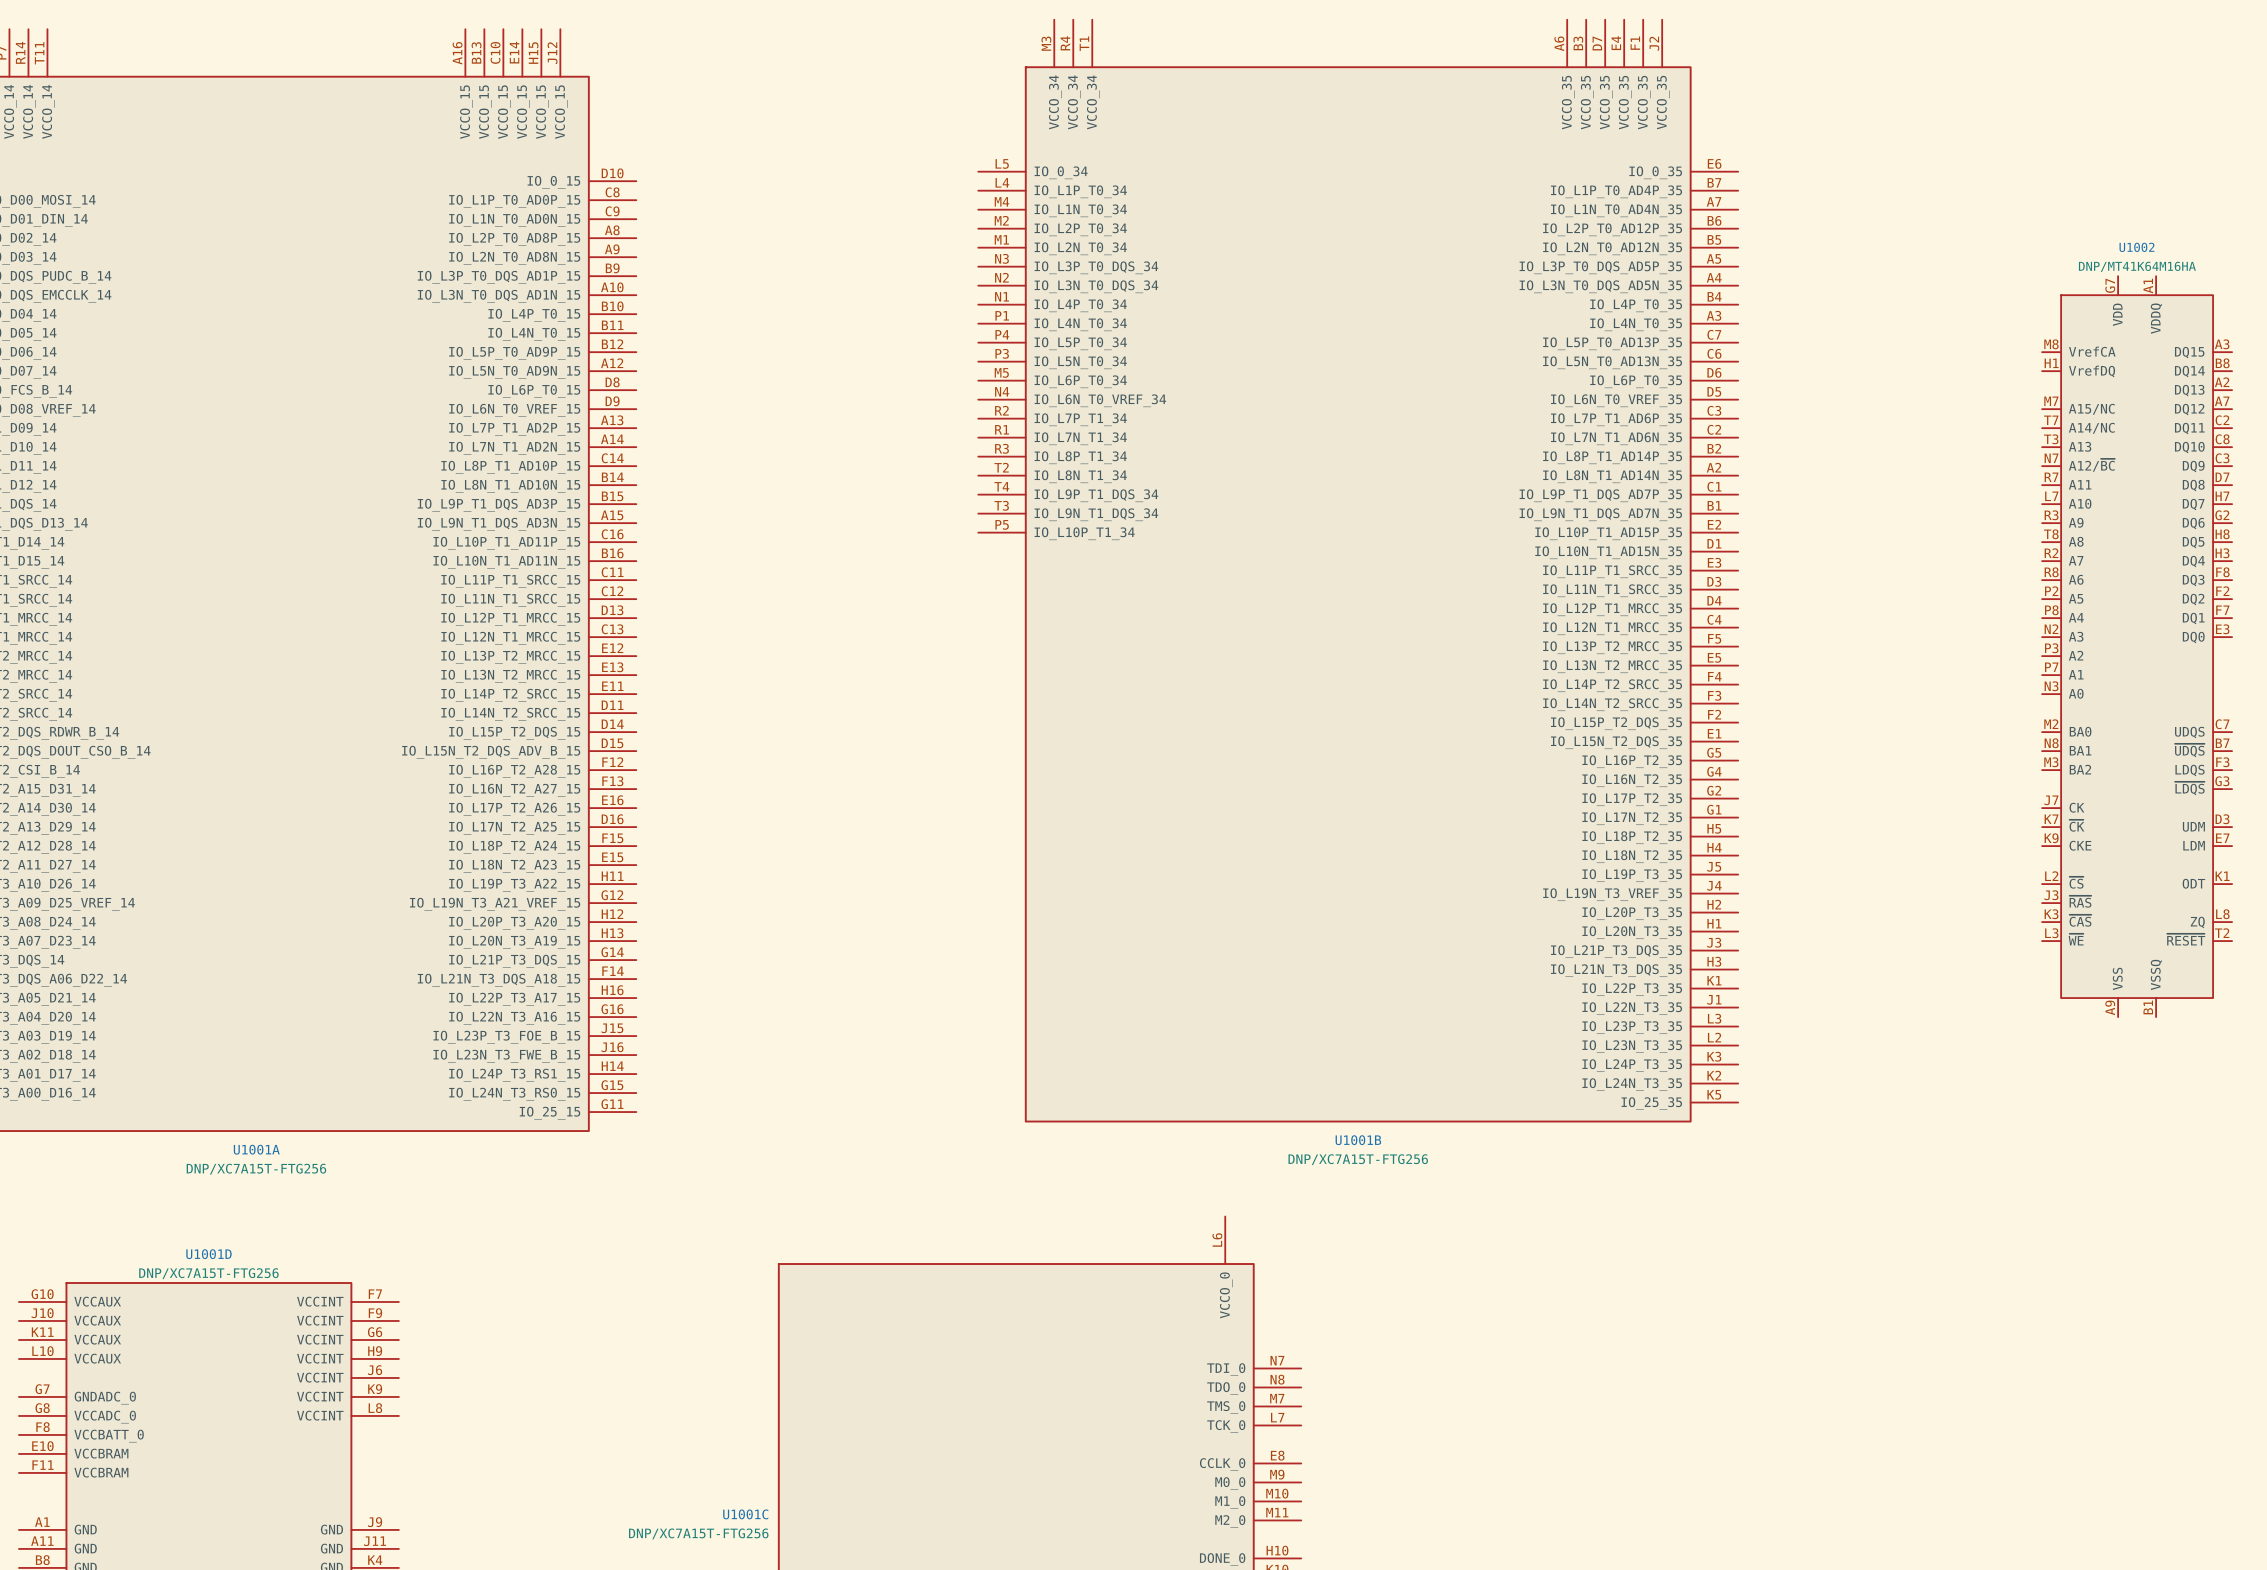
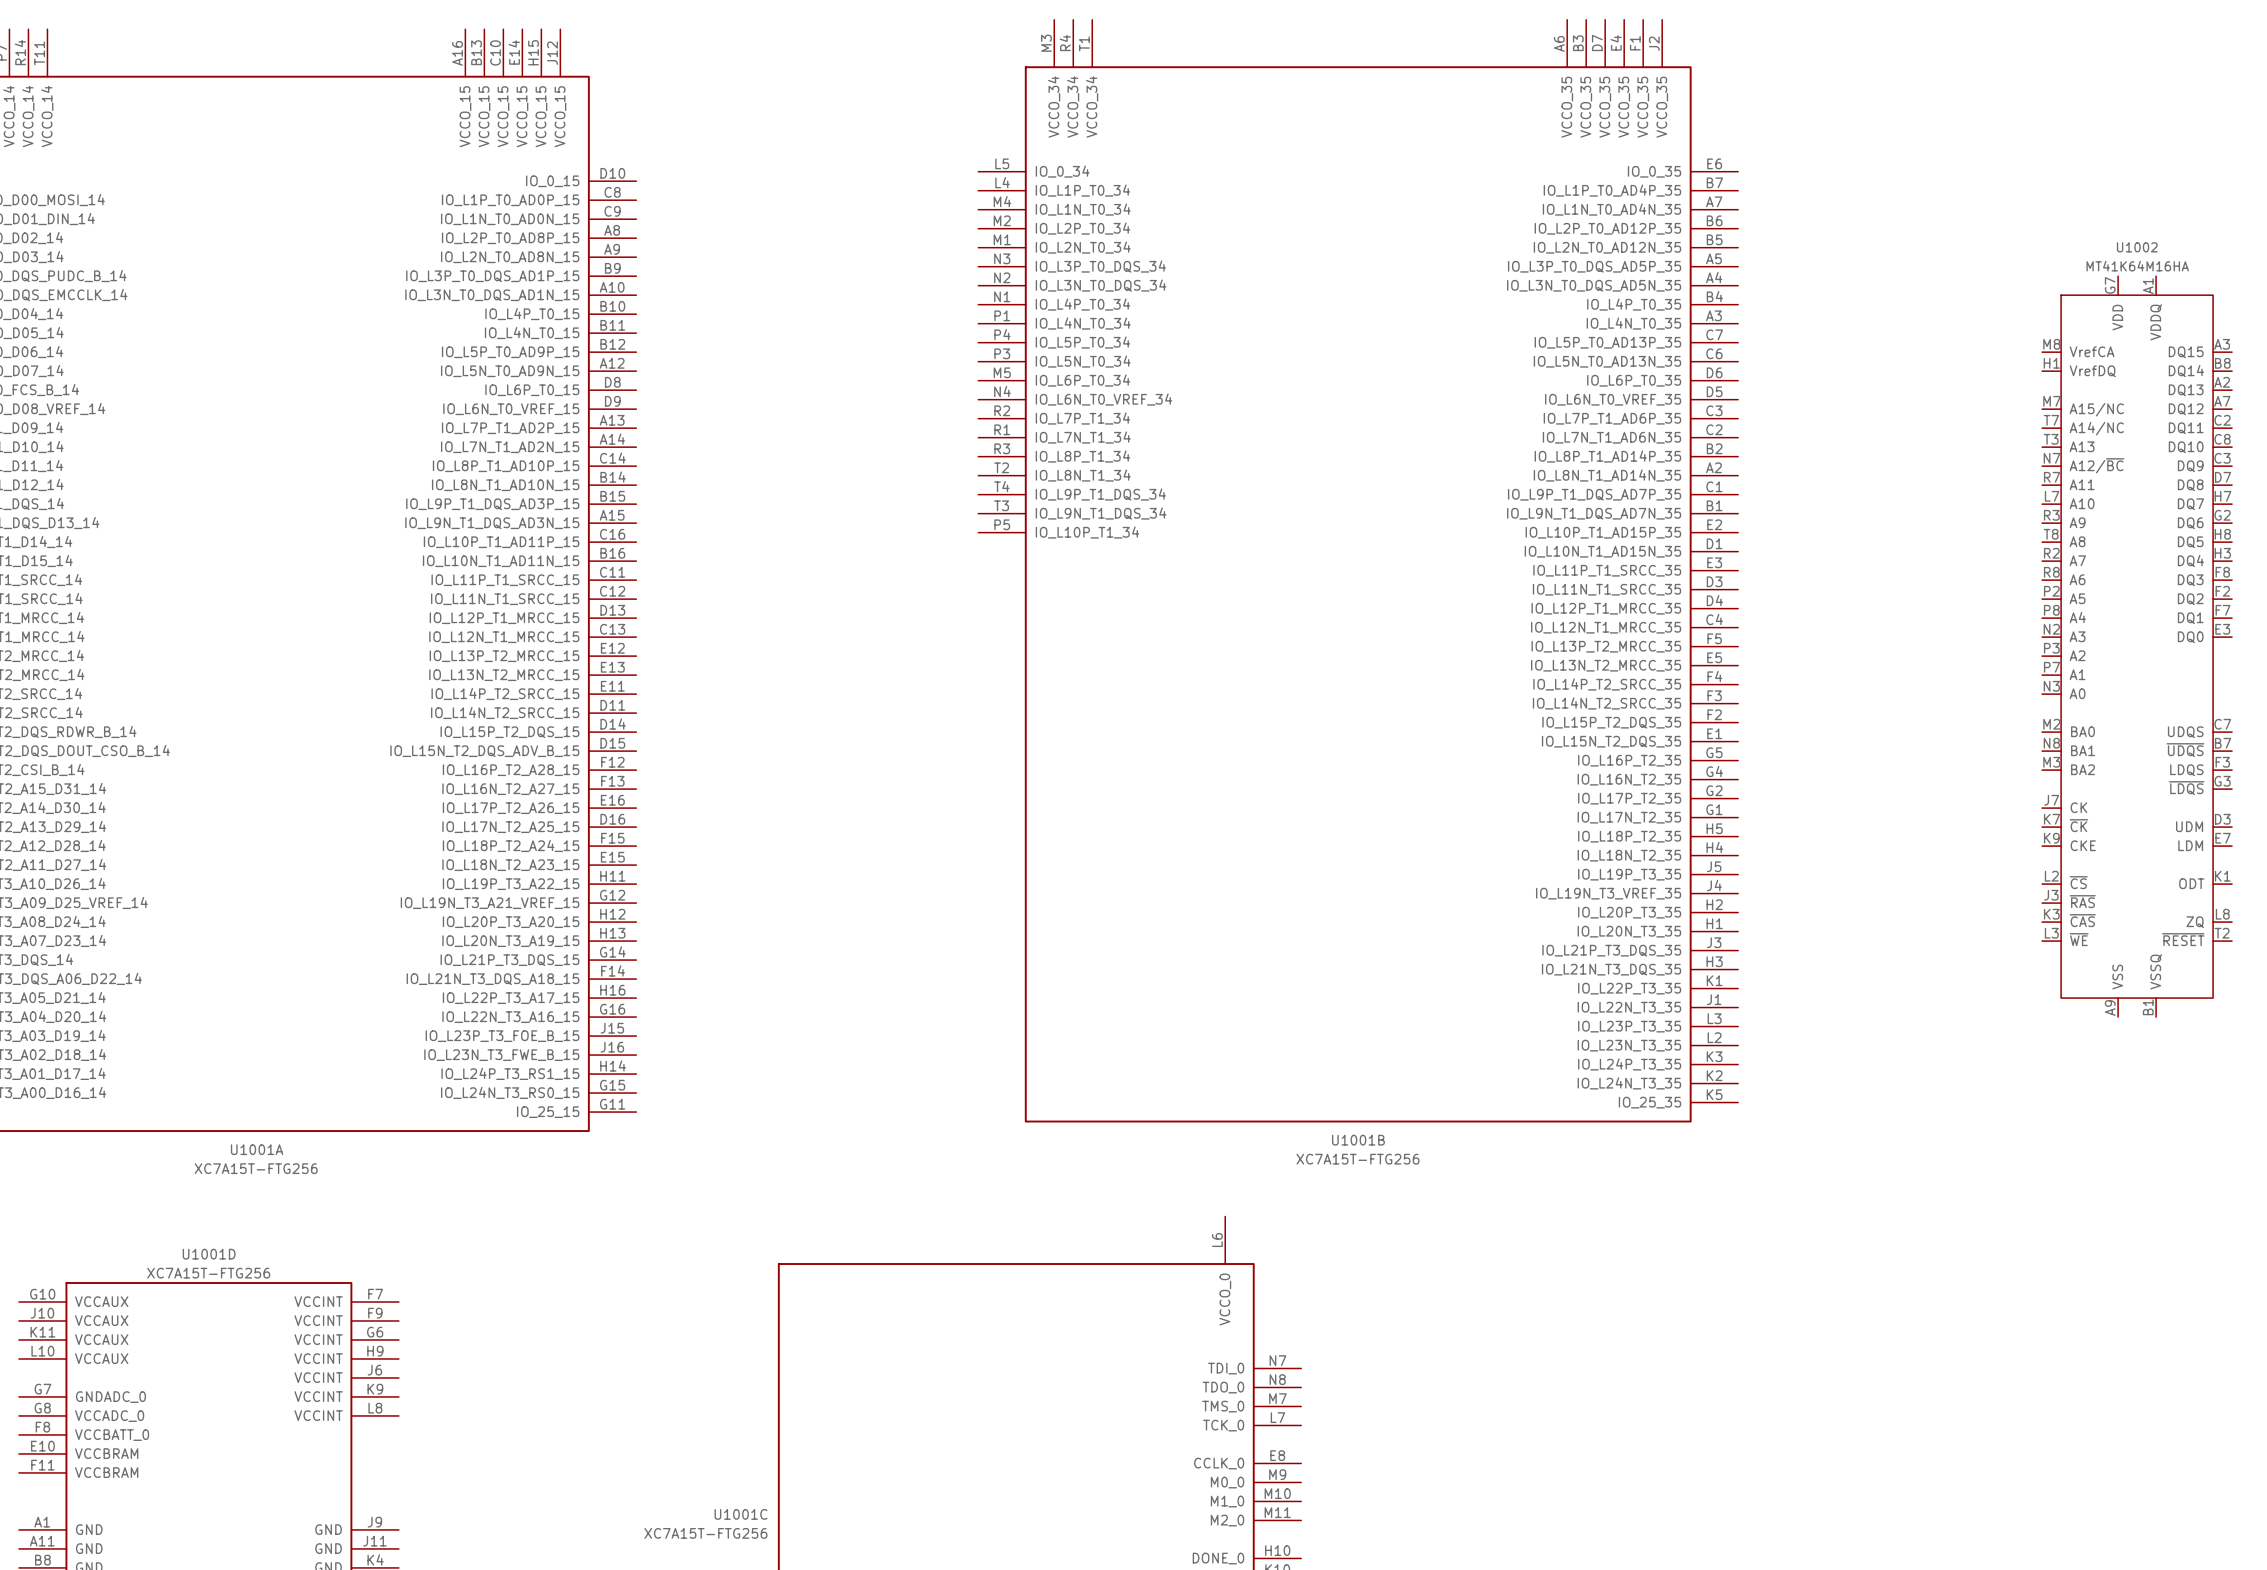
U1002 value: DNP/MT41K64M16HA (2137, 266) -> MT41K64M16HA (2137, 266)
U1001B value: DNP/XC7A15T-FTG256 (1358, 1159) -> XC7A15T-FTG256 (1357, 1159)
U1001A value: DNP/XC7A15T-FTG256 (256, 1169) -> XC7A15T-FTG256 (256, 1168)
U1001D value: DNP/XC7A15T-FTG256 (208, 1273) -> XC7A15T-FTG256 (208, 1273)
U1001C value: DNP/XC7A15T-FTG256 (698, 1533) -> XC7A15T-FTG256 (705, 1533)

